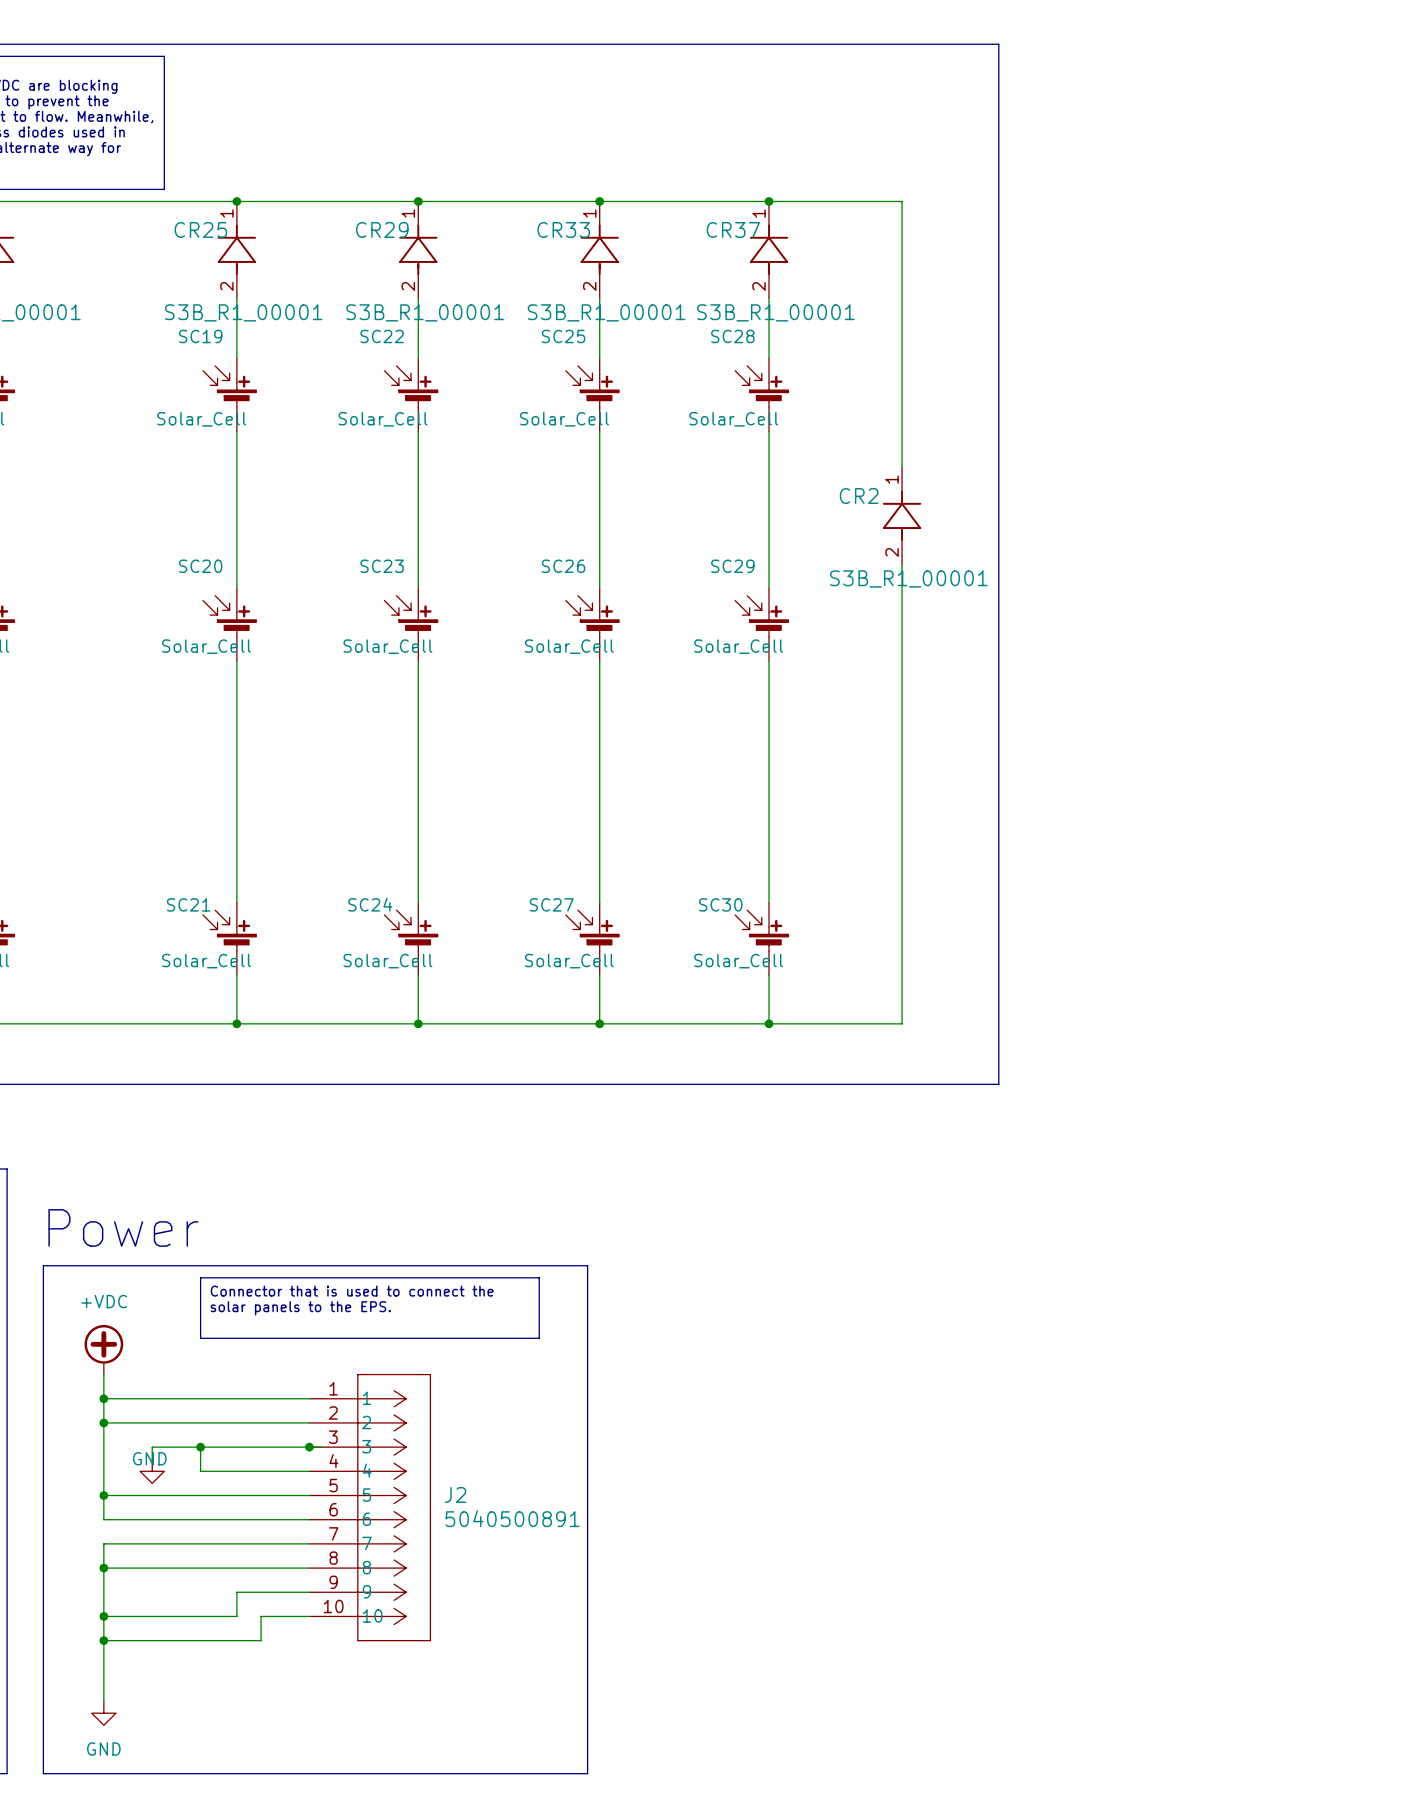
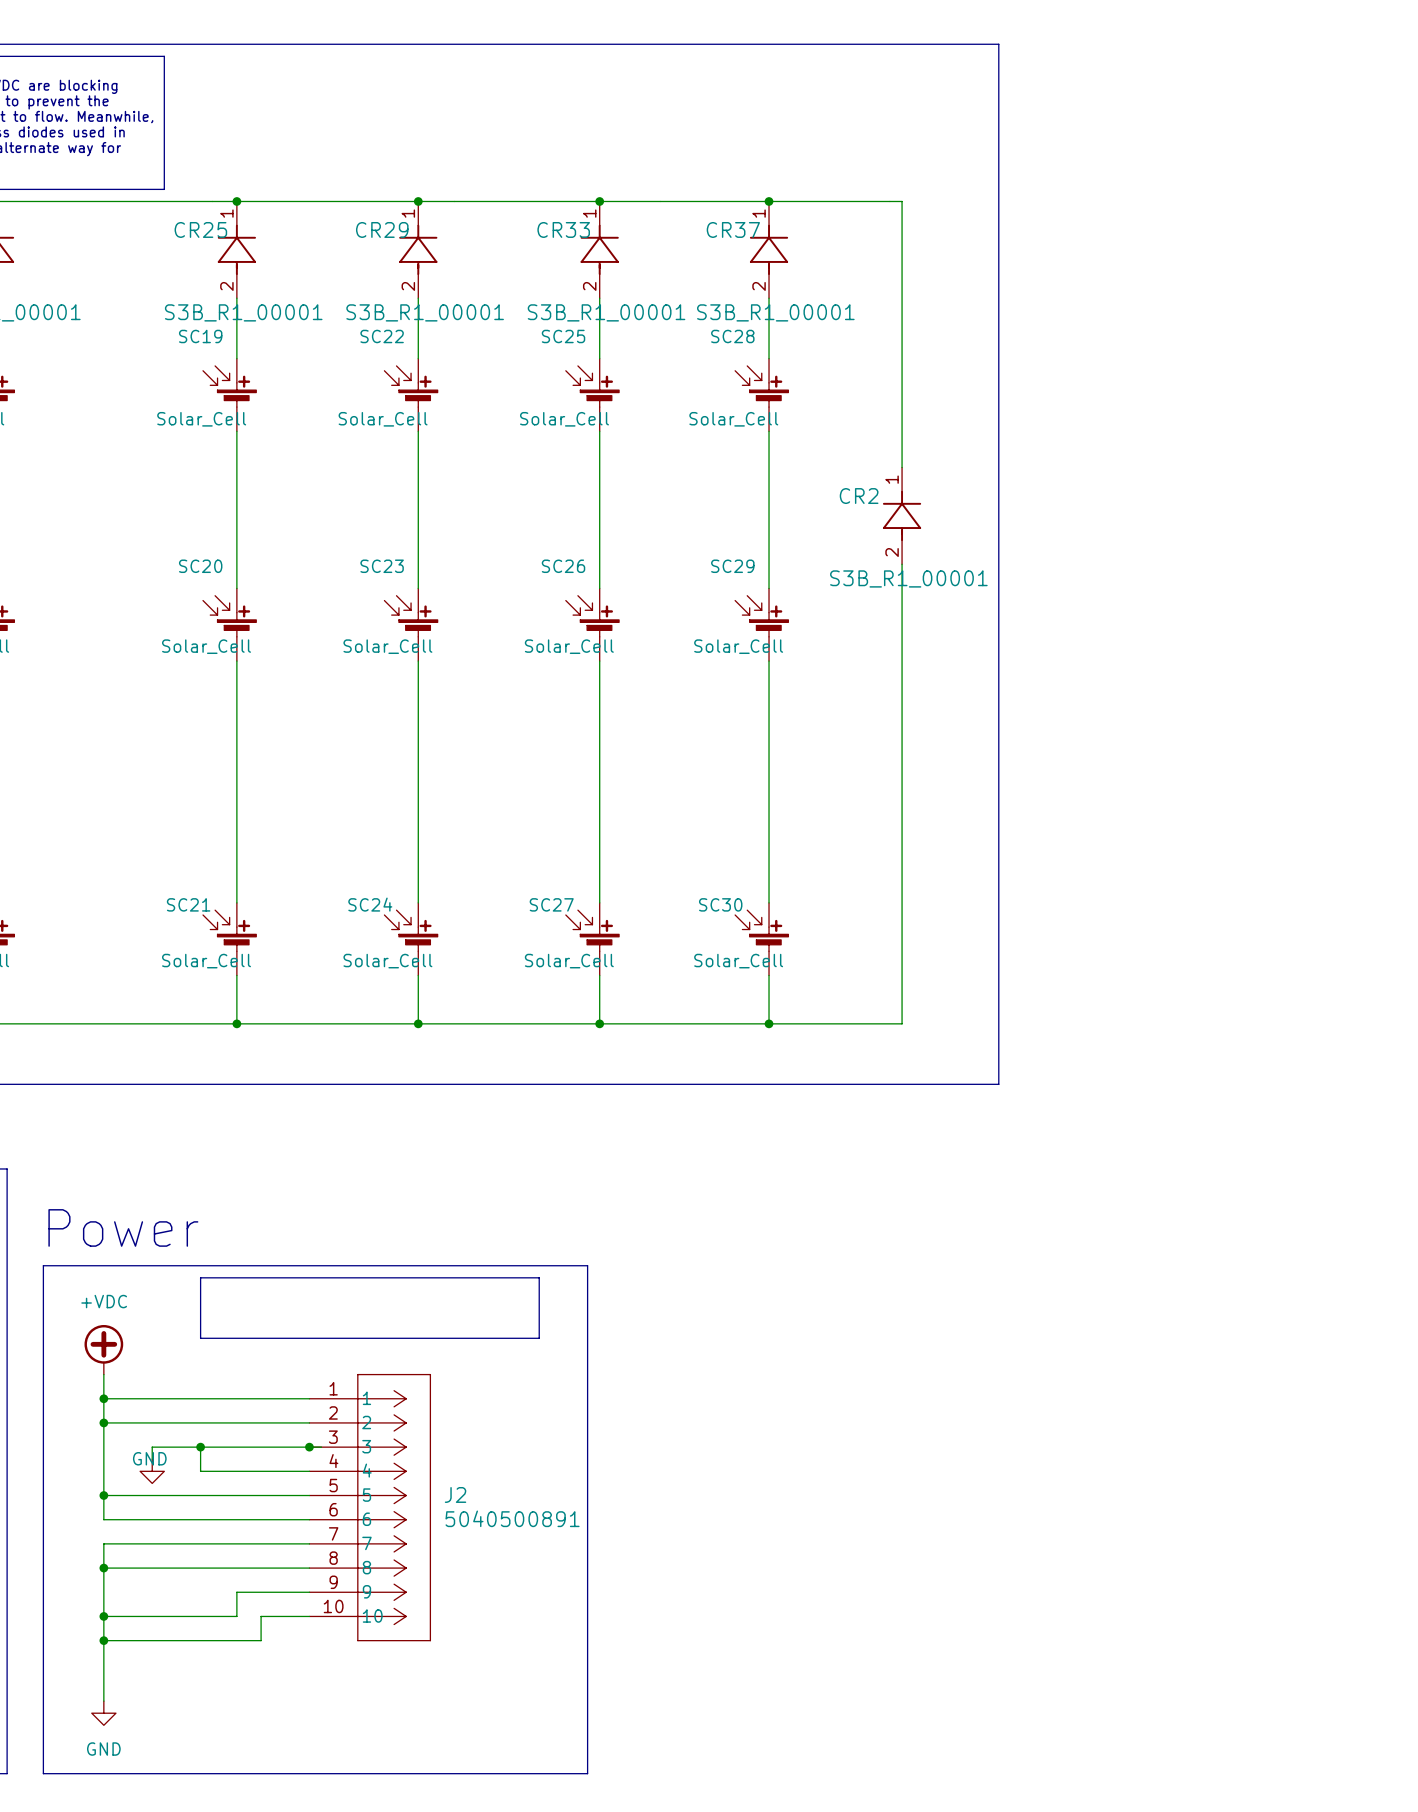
text: Connector that is used to connect the (352, 1291) -> none
text: solar panels to the EPS. (300, 1308) -> none

